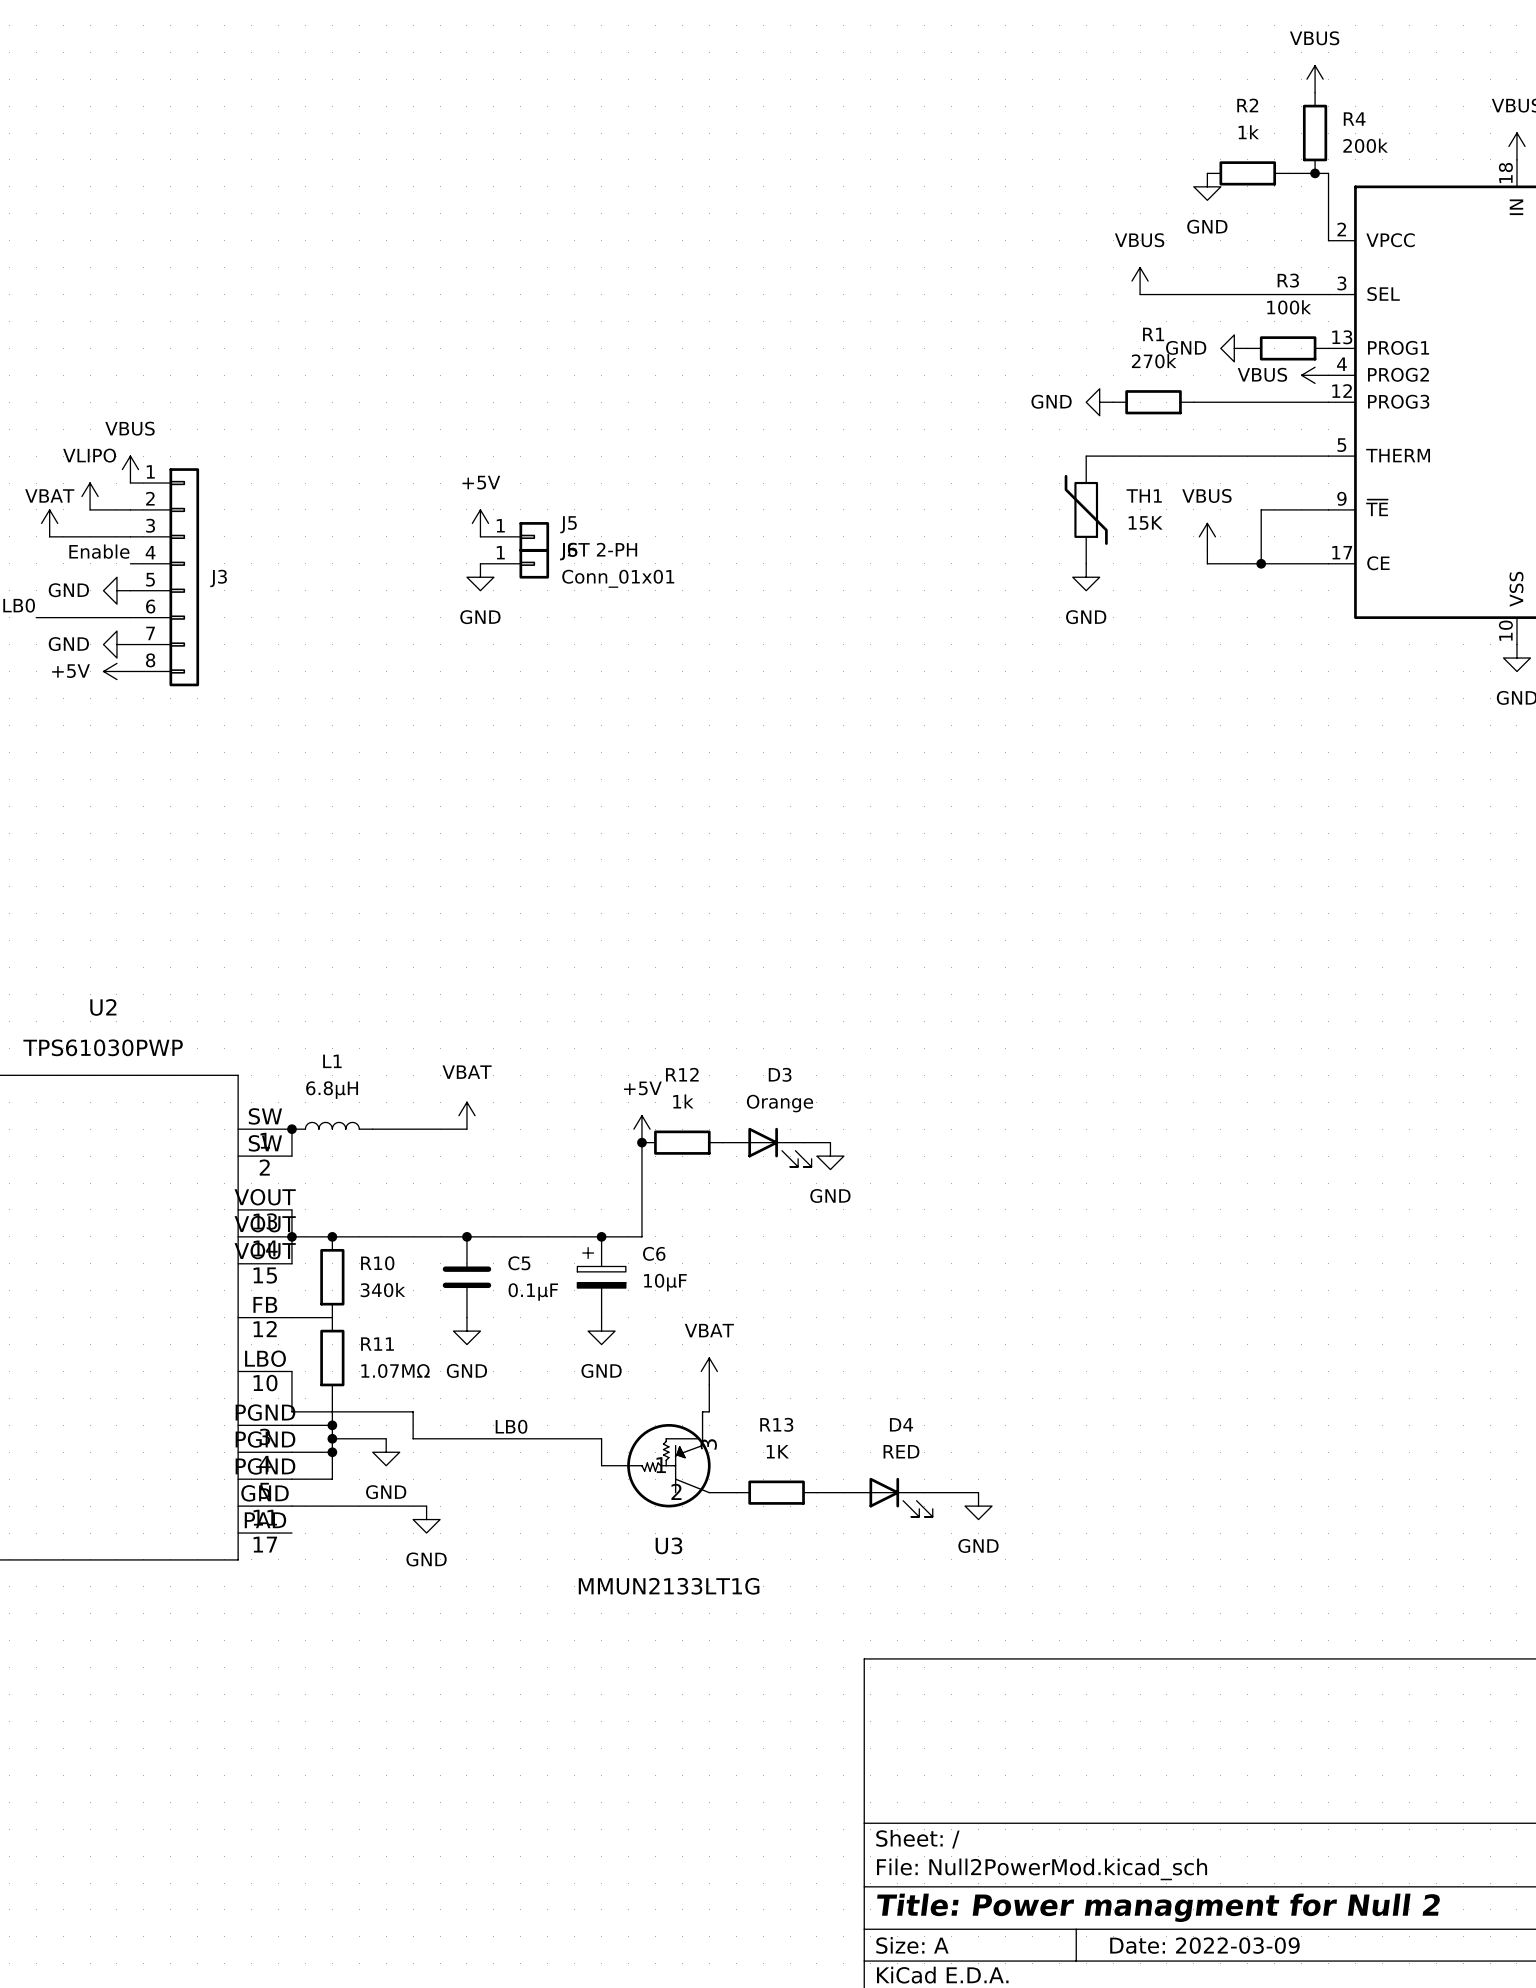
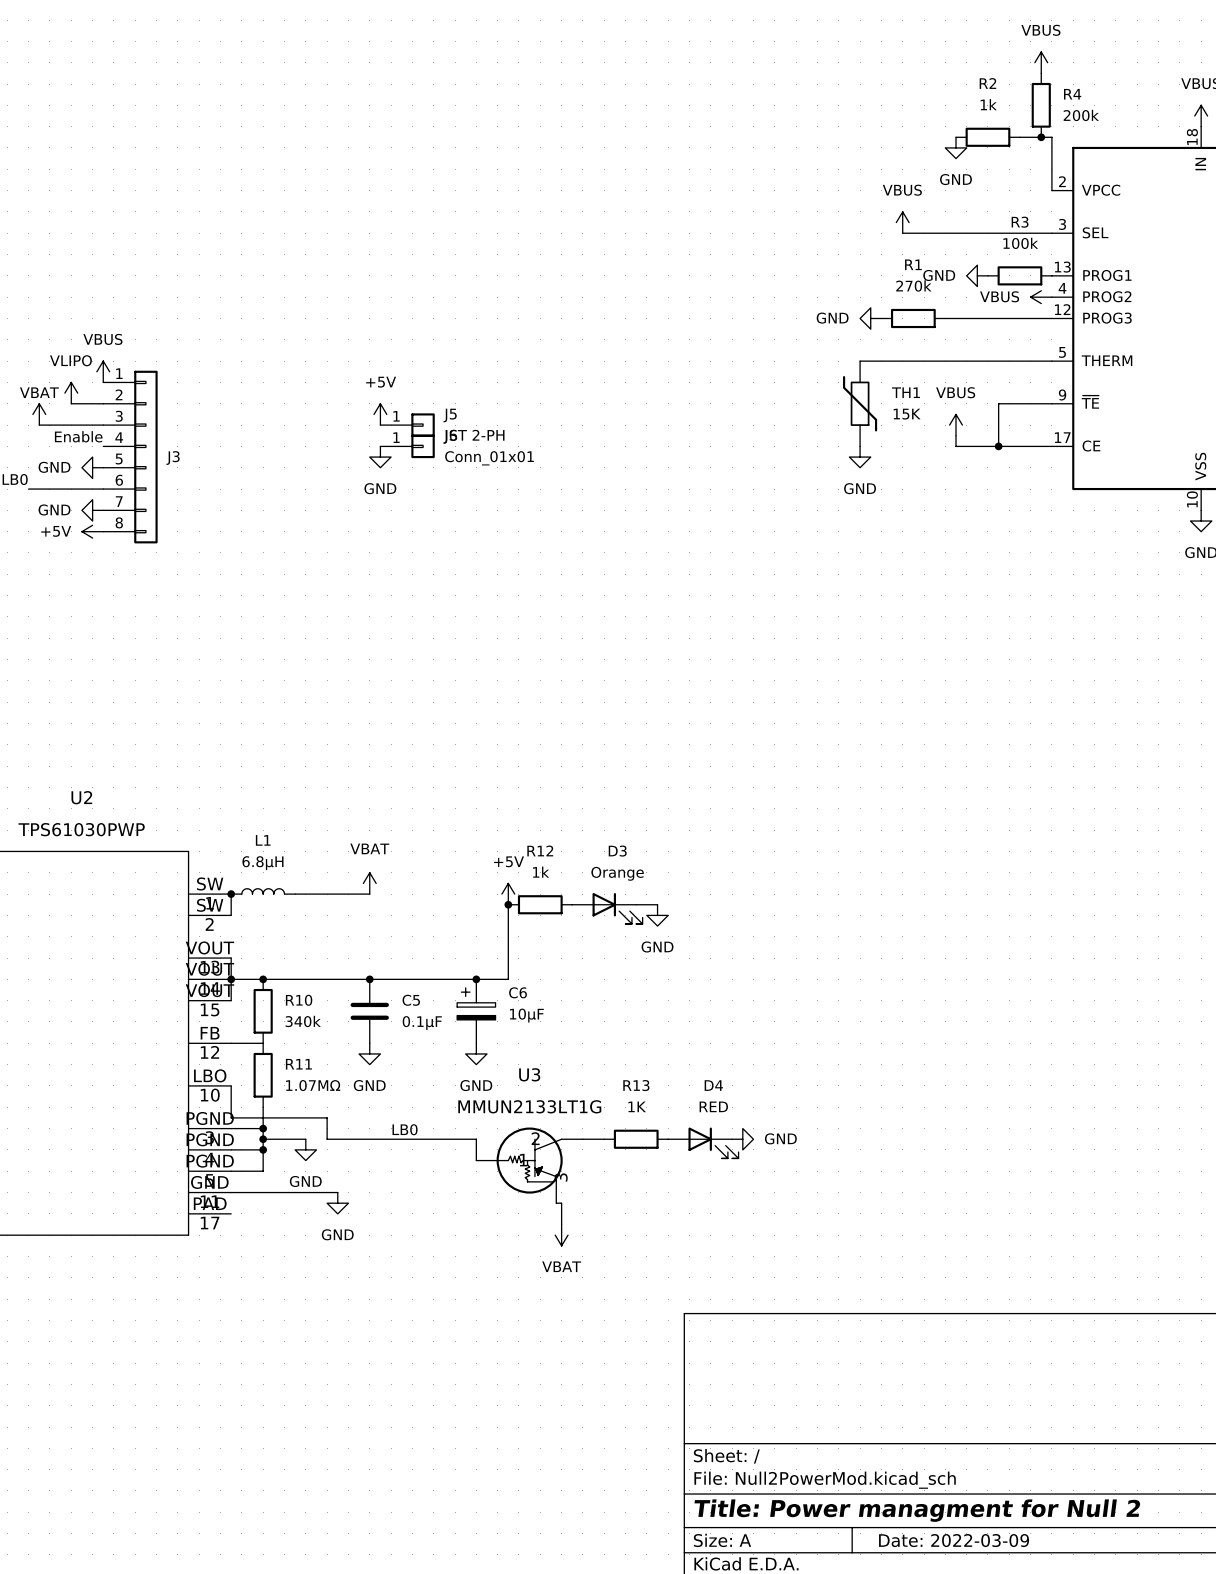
power symbol rotation: 0° (709, 1371) -> 180° (561, 1235)
power symbol position: VBAT (709, 1371) -> VBAT (561, 1235)
U3 flip: as is (668, 1459) -> up-down (529, 1165)
R13 position: (776, 1492) -> (636, 1139)
wire: (816, 1492) (843, 1492) -> (582, 1139) (604, 1139)
wire: (924, 1492) (978, 1492) -> none
D4 position: (888, 1497) -> (703, 1142)
power symbol rotation: 0° (978, 1506) -> 90° counterclockwise (742, 1139)
power symbol position: GND (978, 1506) -> GND (742, 1139)
U3 name position: U3 (668, 1545) -> U3 (529, 1074)
U3 value position: MMUN2133LT1G (669, 1586) -> MMUN2133LT1G (529, 1106)

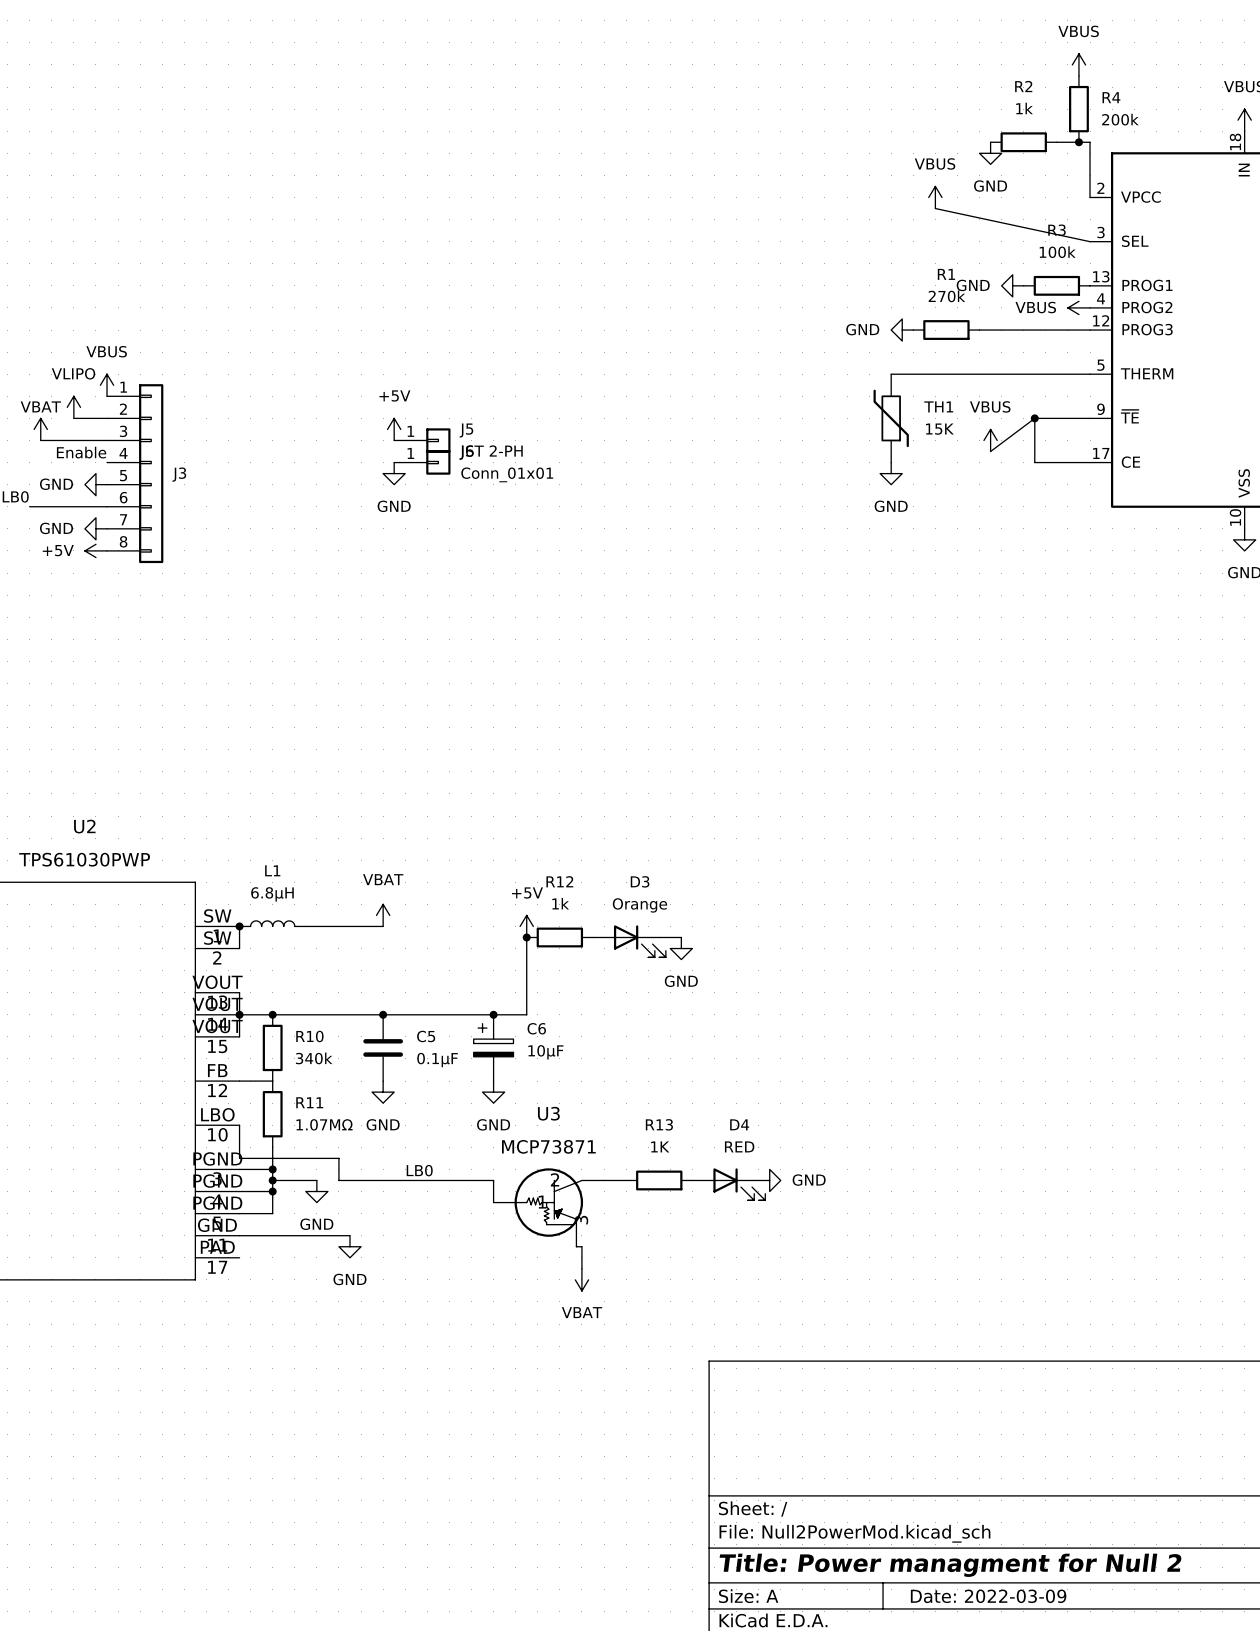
power symbol position: VBUS (902, 222) -> VBUS (935, 197)
wire: (902, 233) (1051, 233) -> (935, 208) (1090, 241)
wire: (956, 435) (956, 446) (998, 446) -> (990, 451) (1034, 418)
junction position: (998, 446) -> (1034, 418)
U3 value: MMUN2133LT1G (529, 1106) -> MCP73871 (548, 1146)

